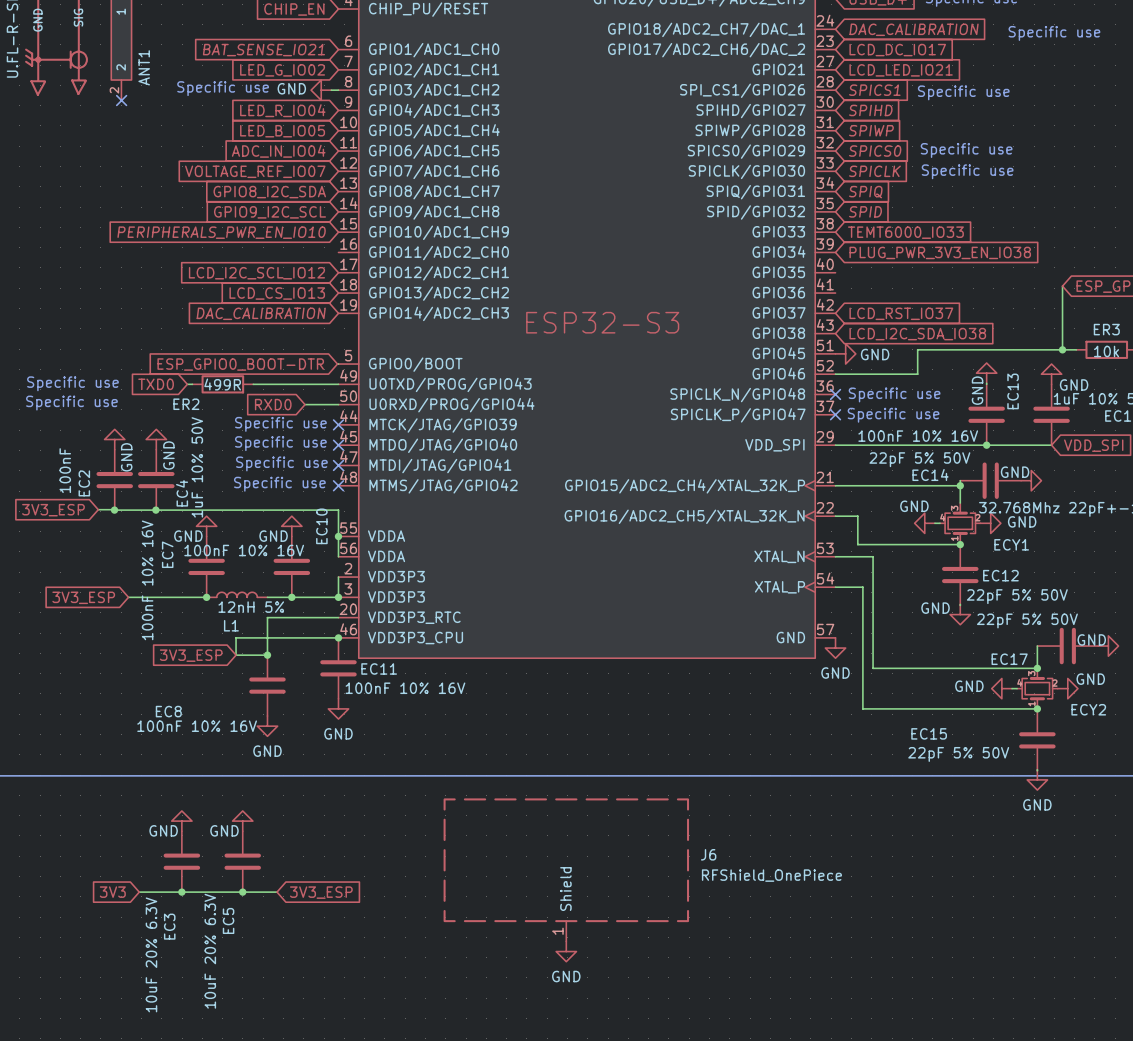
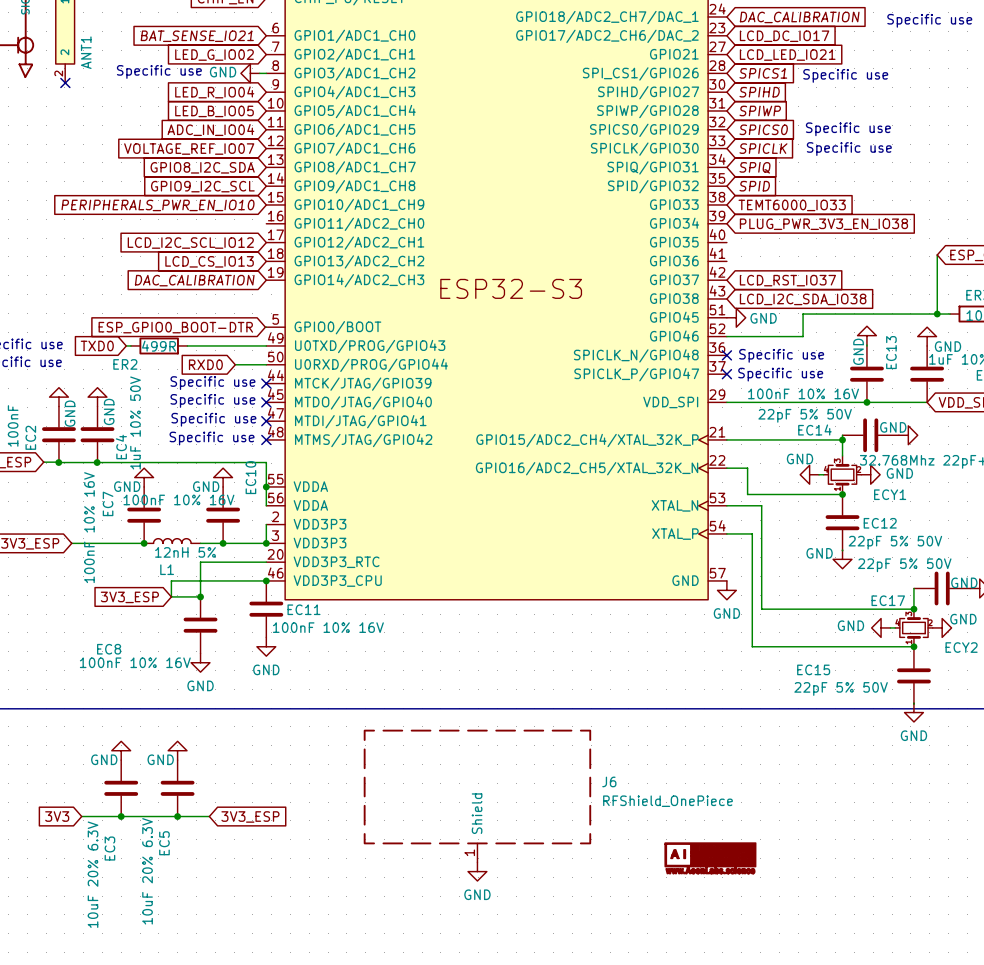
power symbol: none -> (710, 858)

